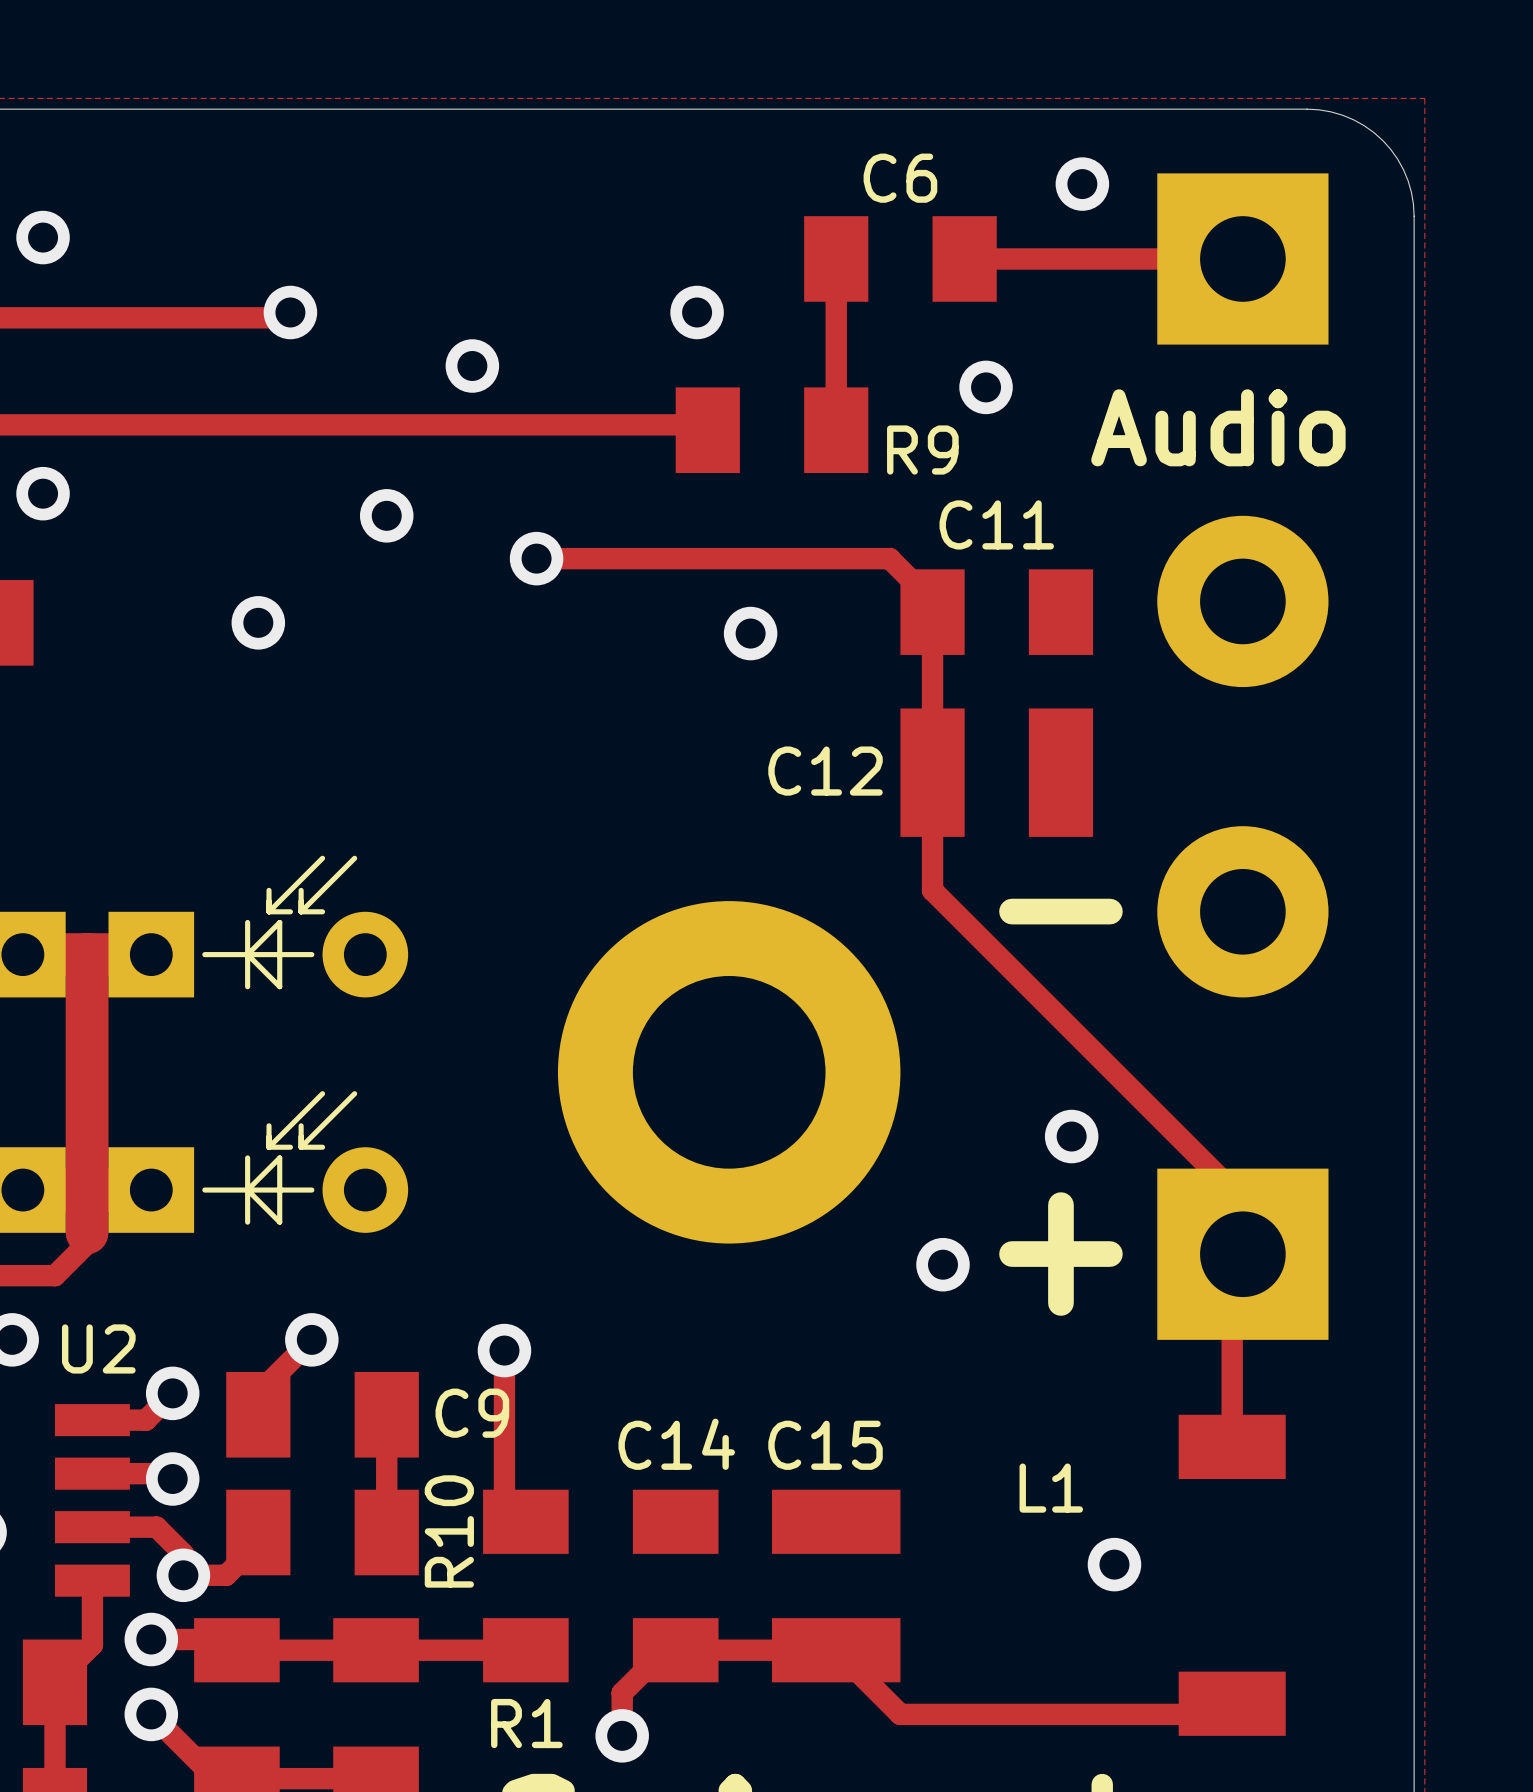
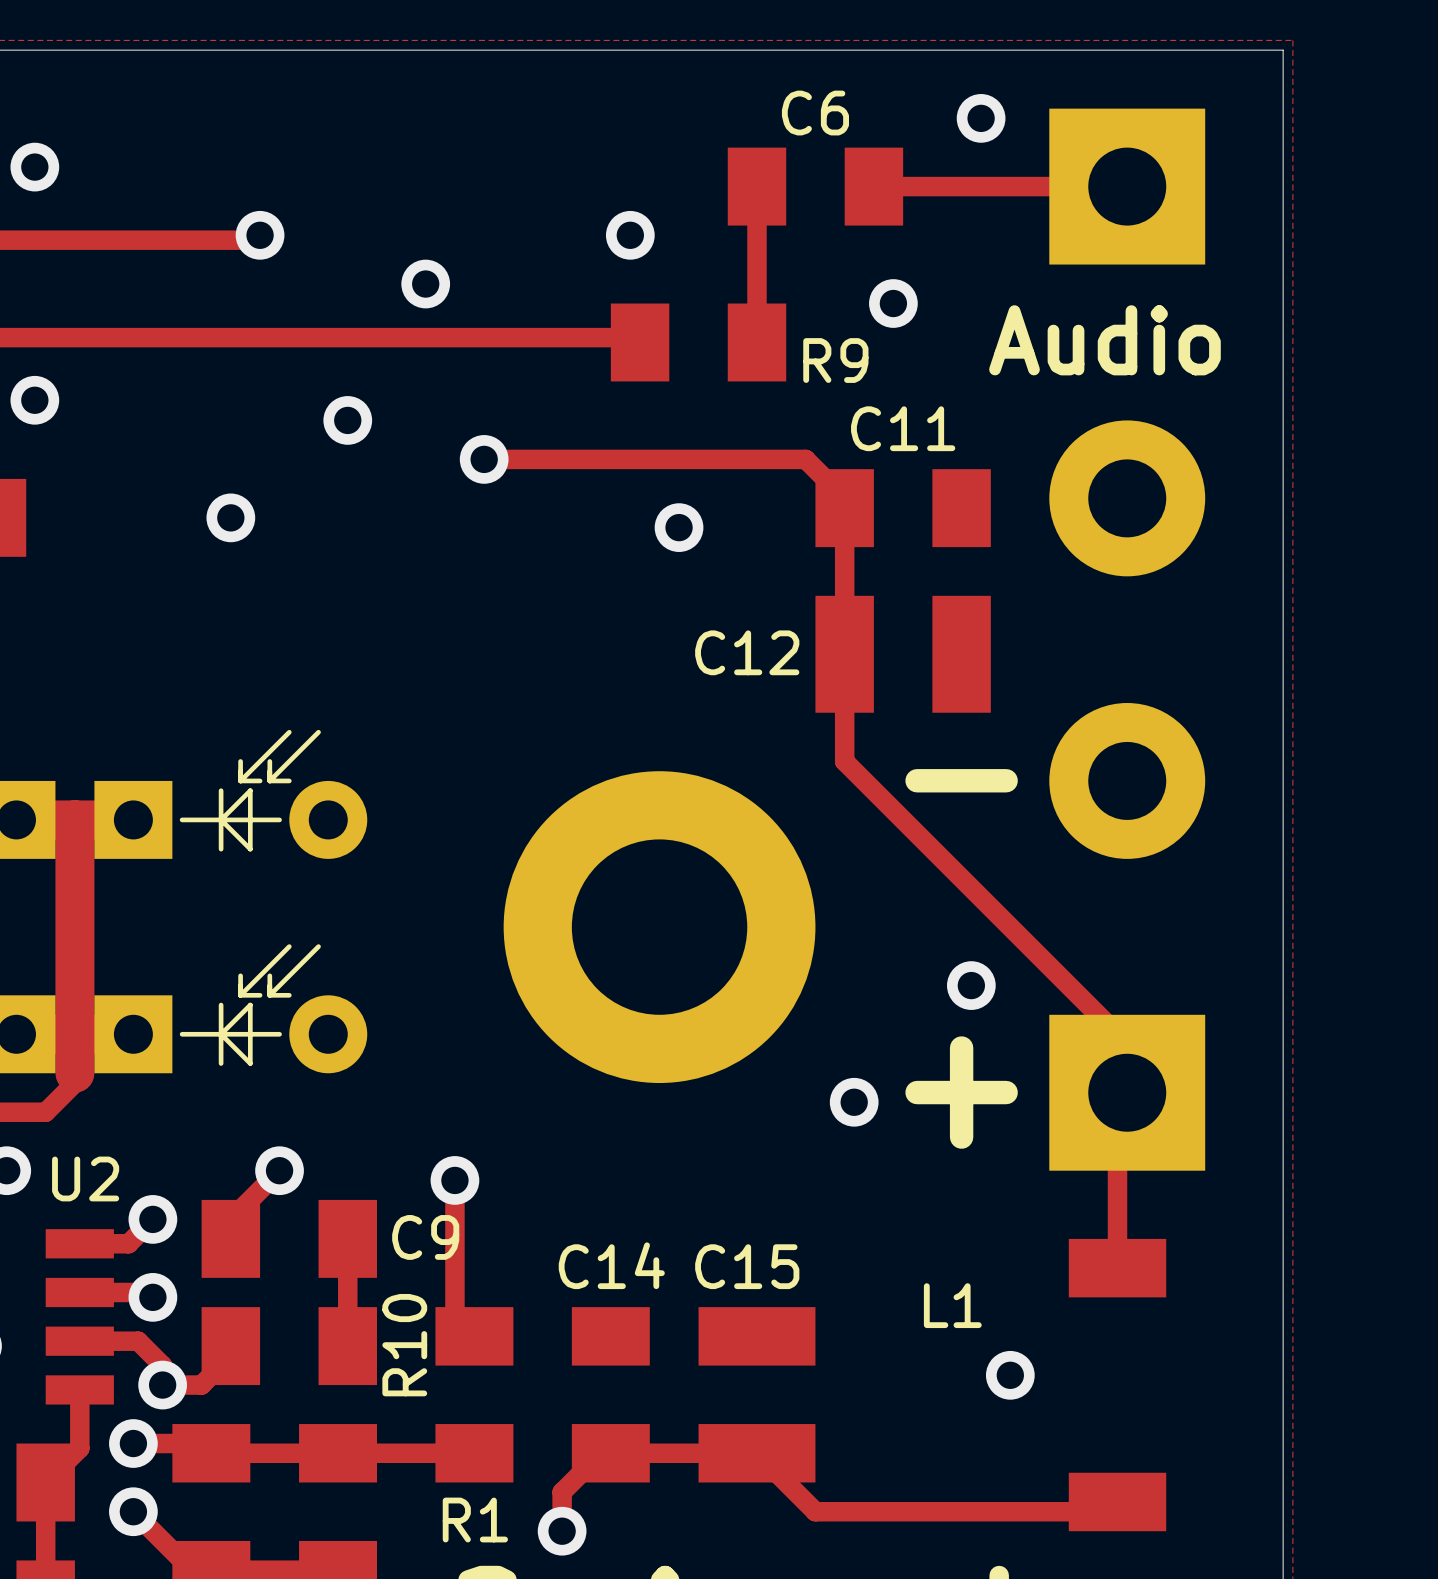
board edge: (1307, 109) (1330, 111) (1353, 119) (1382, 140) (1403, 169) (1411, 192) (1414, 216) -> (1185, 50) (1283, 50) (1283, 147)

